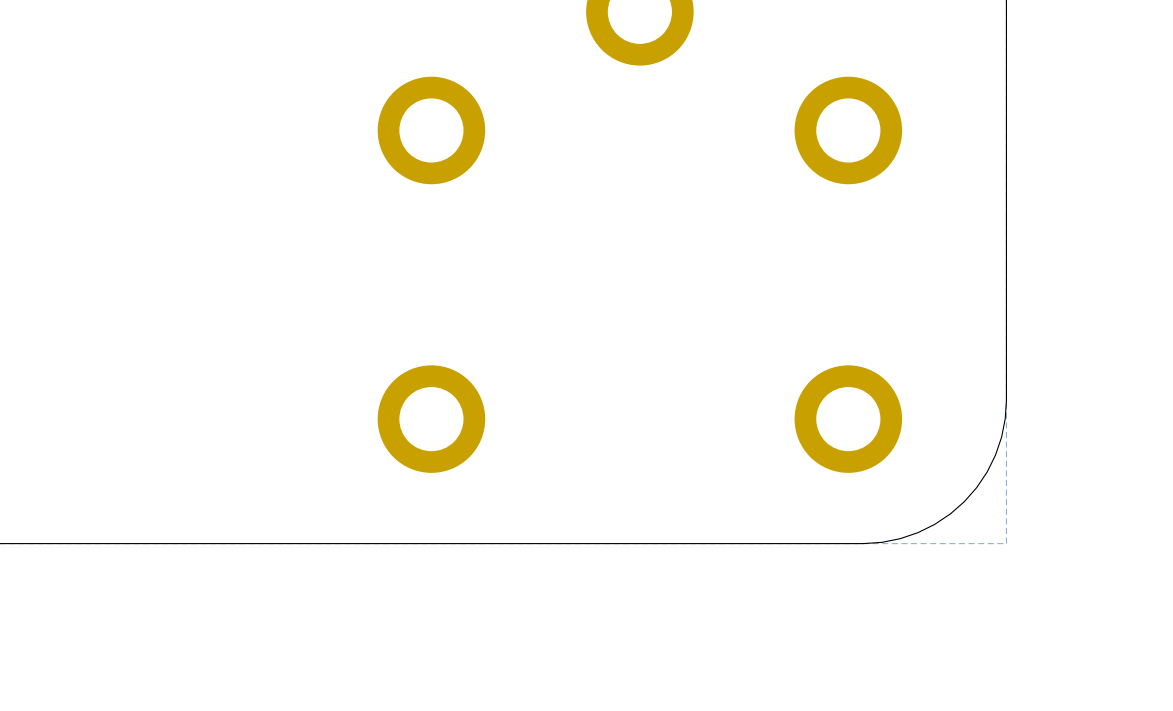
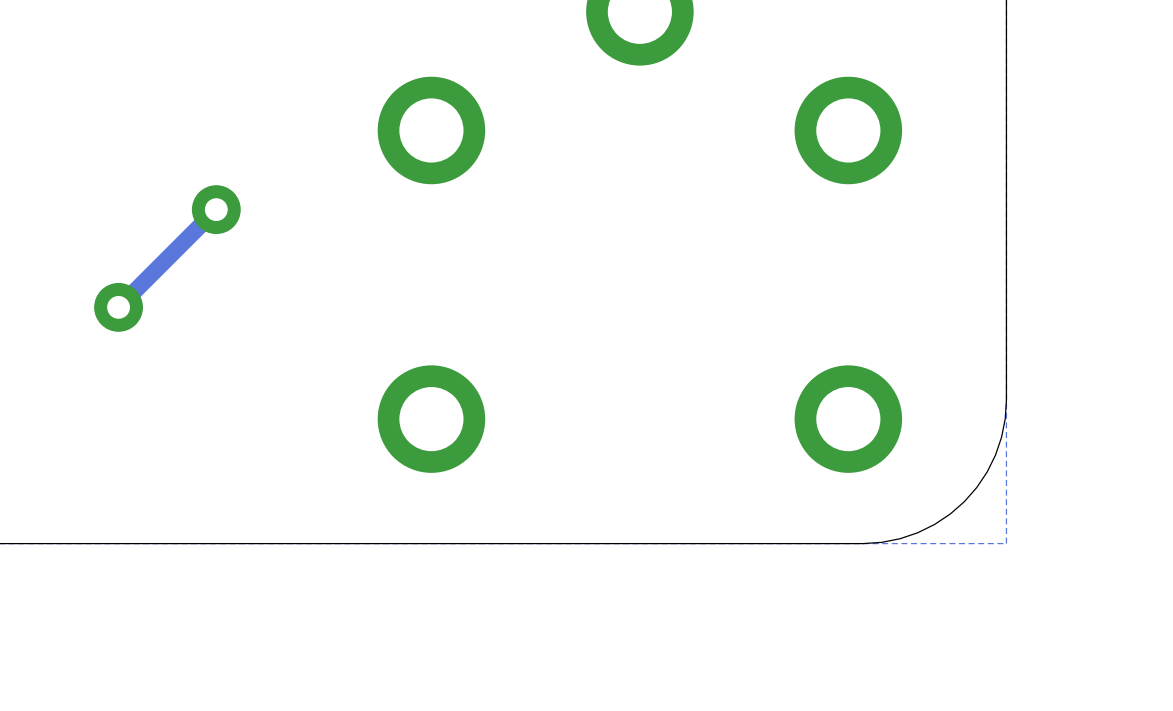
track: none -> (216, 209) (118, 307)
via: none -> (216, 209)
via: none -> (118, 307)

